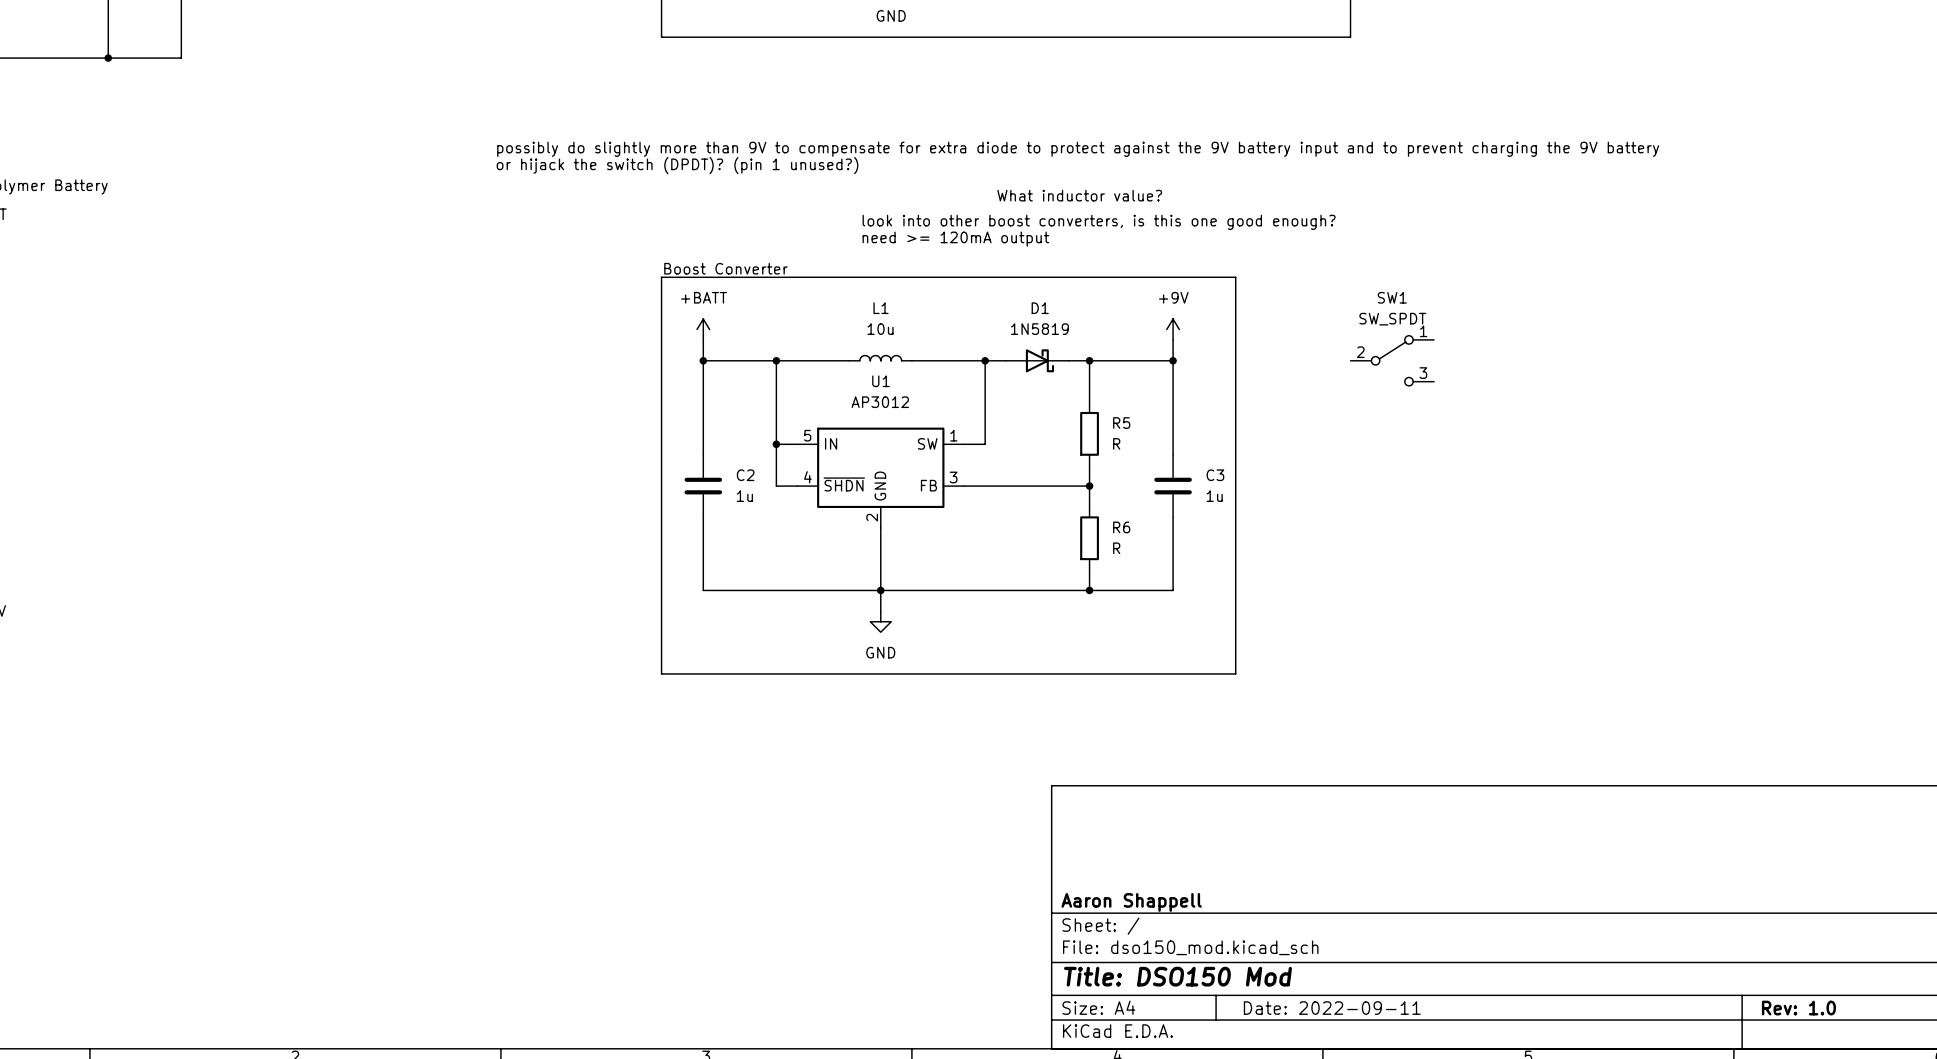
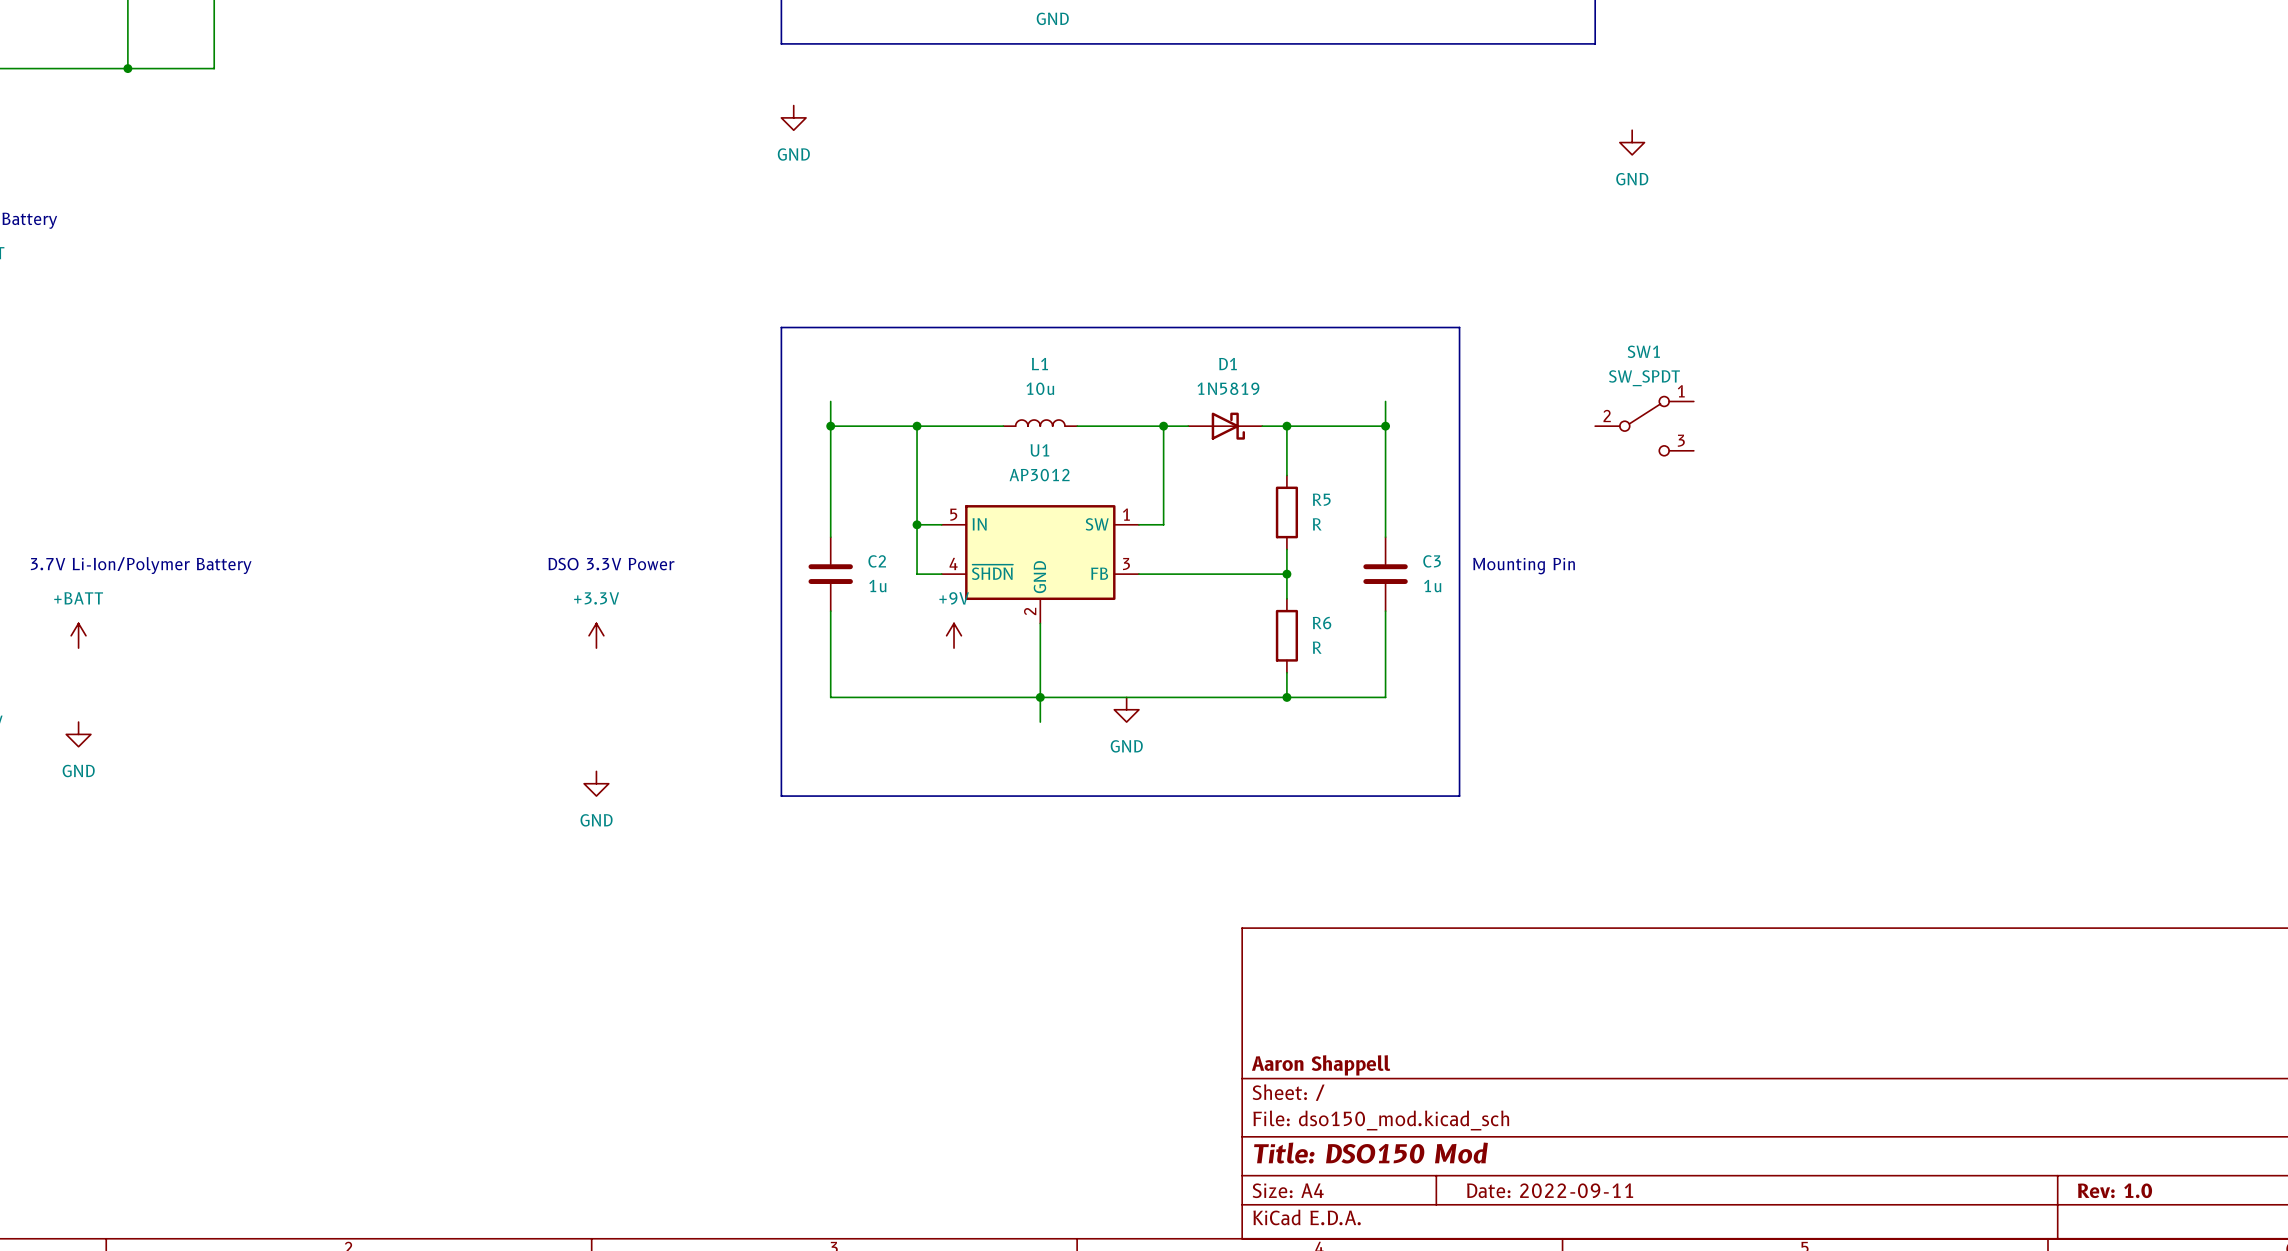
power symbol: none -> GND (793, 117)
power symbol: none -> GND (1632, 142)
text: possibly do slightly more than 9V to compensate for extra diode to protect against the 9V battery input and to prevent charging the 9V battery (1078, 149) -> none
text: or hijack the switch (DPDT)? (pin 1 unused?) (677, 165) -> none
text: What inductor value? (1079, 195) -> none
text: look into other boost converters, is this one good enough? (1099, 222) -> none
text: need >= 120mA output (955, 239) -> none
text: Boost Converter (726, 268) -> none
power symbol: +BATT (703, 329) -> none
power symbol: +9V (1173, 329) -> none
text: none -> DSO 3.3V Power (611, 564)
text: none -> 3.7V Li-Ion/Polymer Battery (141, 565)
text: none -> Mounting Pin (1524, 566)
power symbol: none -> +BATT (78, 635)
power symbol: none -> +3.3V (596, 635)
power symbol: none -> +9V (954, 635)
power symbol: none -> GND (78, 734)
power symbol position: GND (880, 621) -> GND (1126, 709)
power symbol: none -> GND (596, 783)

